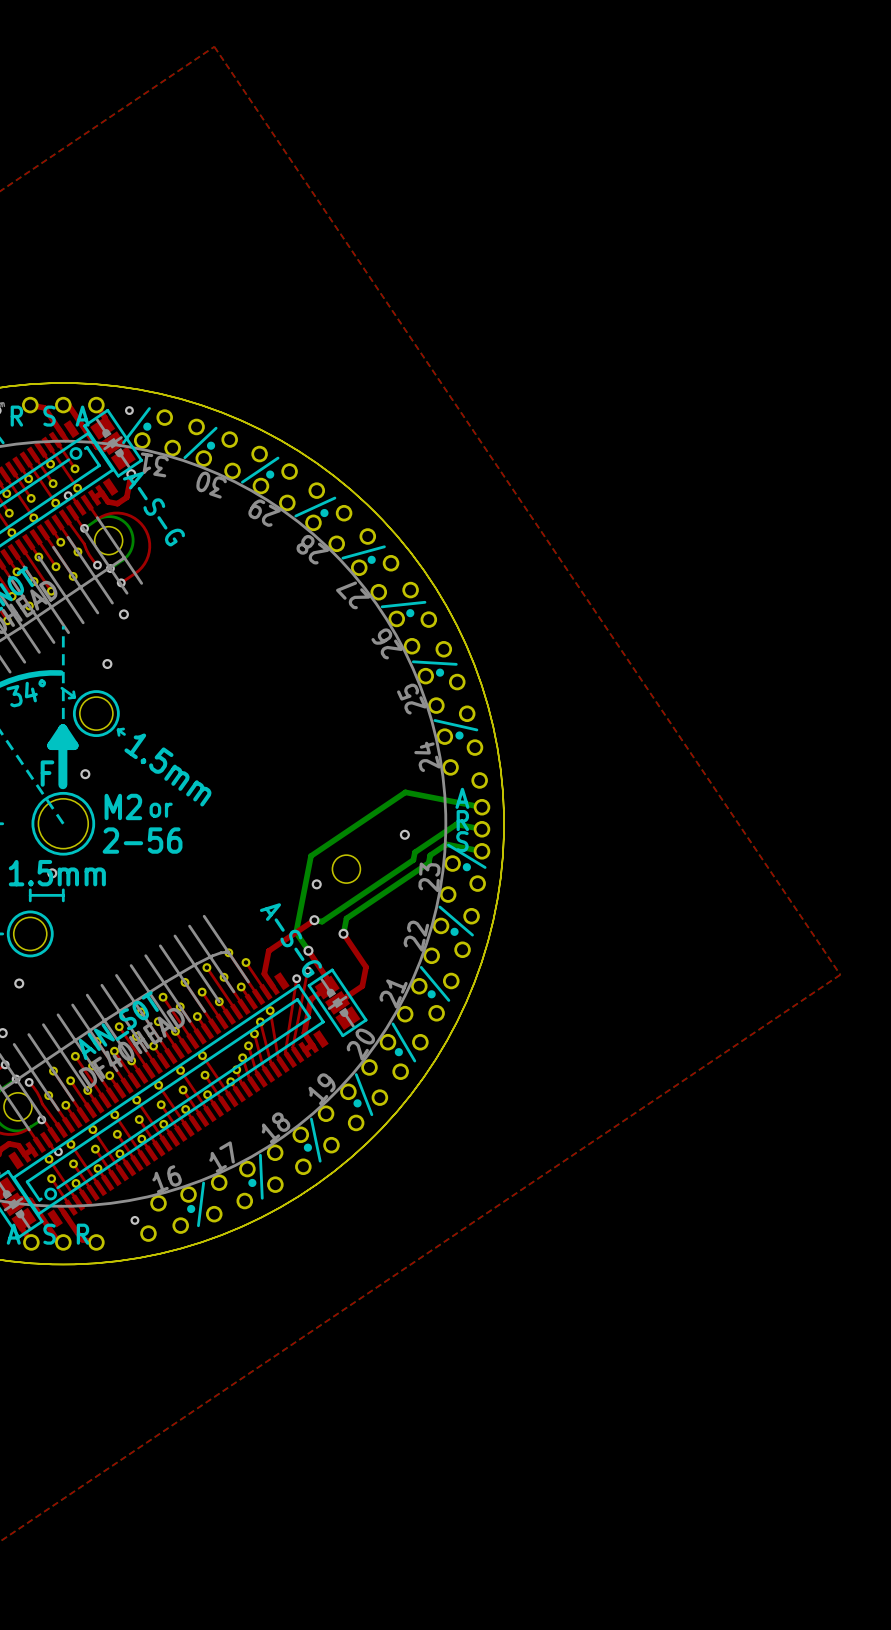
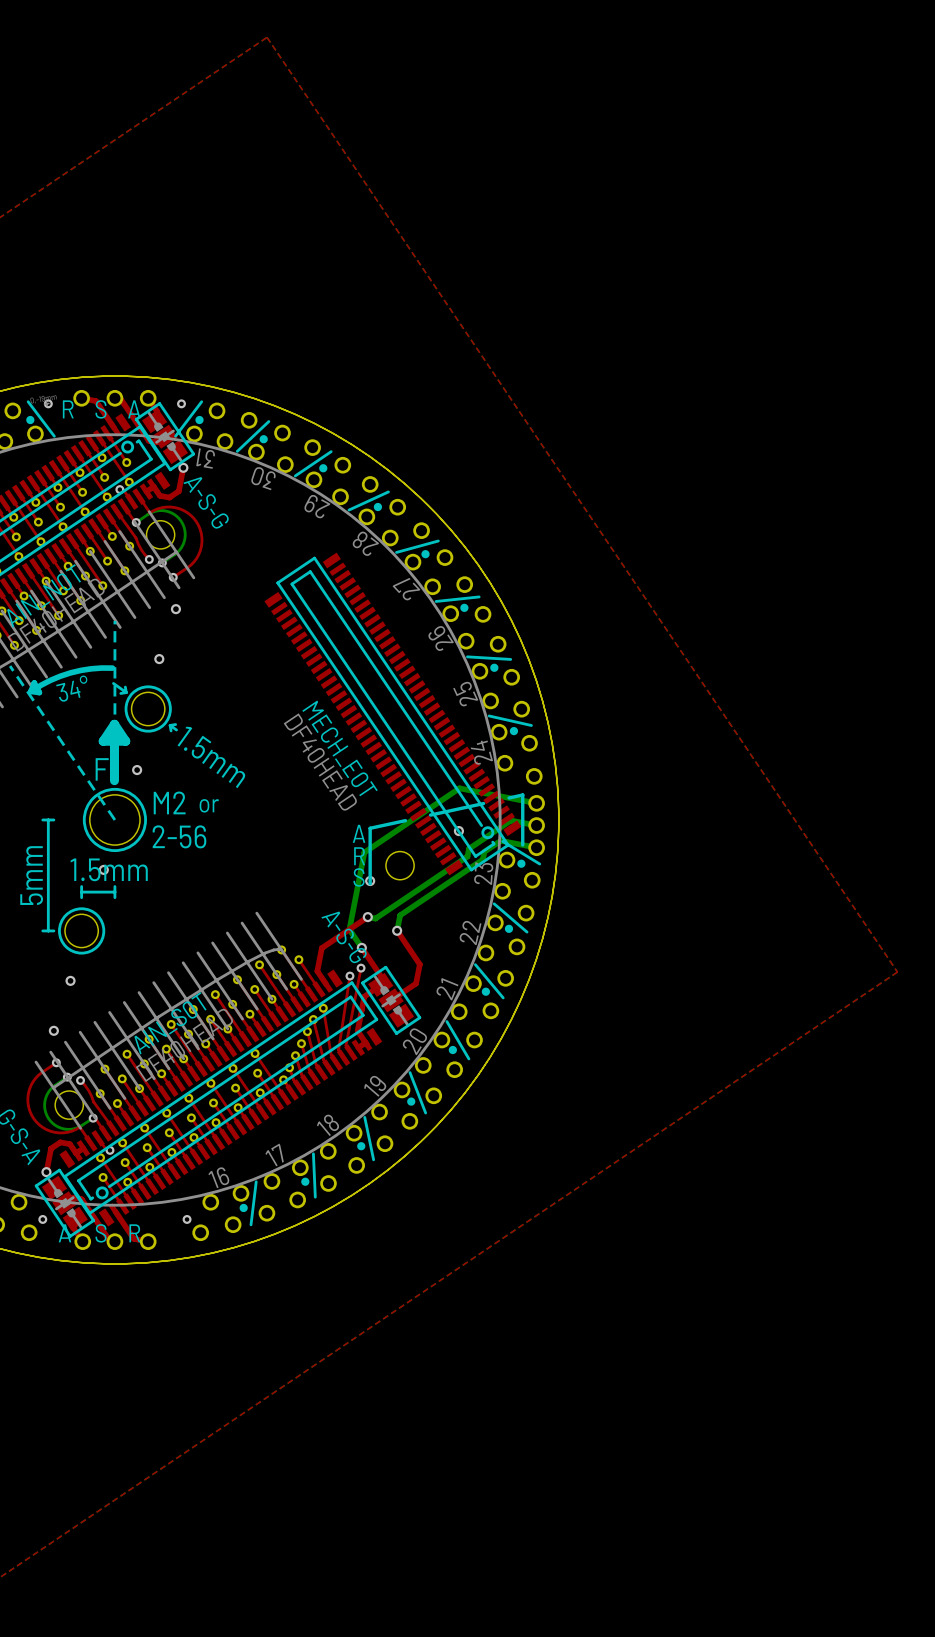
MECH_E0T: none -> DF40HEAD (392, 714)
text position: A (462, 798) -> A (359, 833)
line: none -> (509, 798) (522, 795) (522, 844)
line: none -> (483, 803) (430, 815)
text position: R (462, 820) -> R (359, 856)
line: none -> (405, 820) (370, 828) (370, 883)
text position: S (462, 841) -> S (359, 877)

